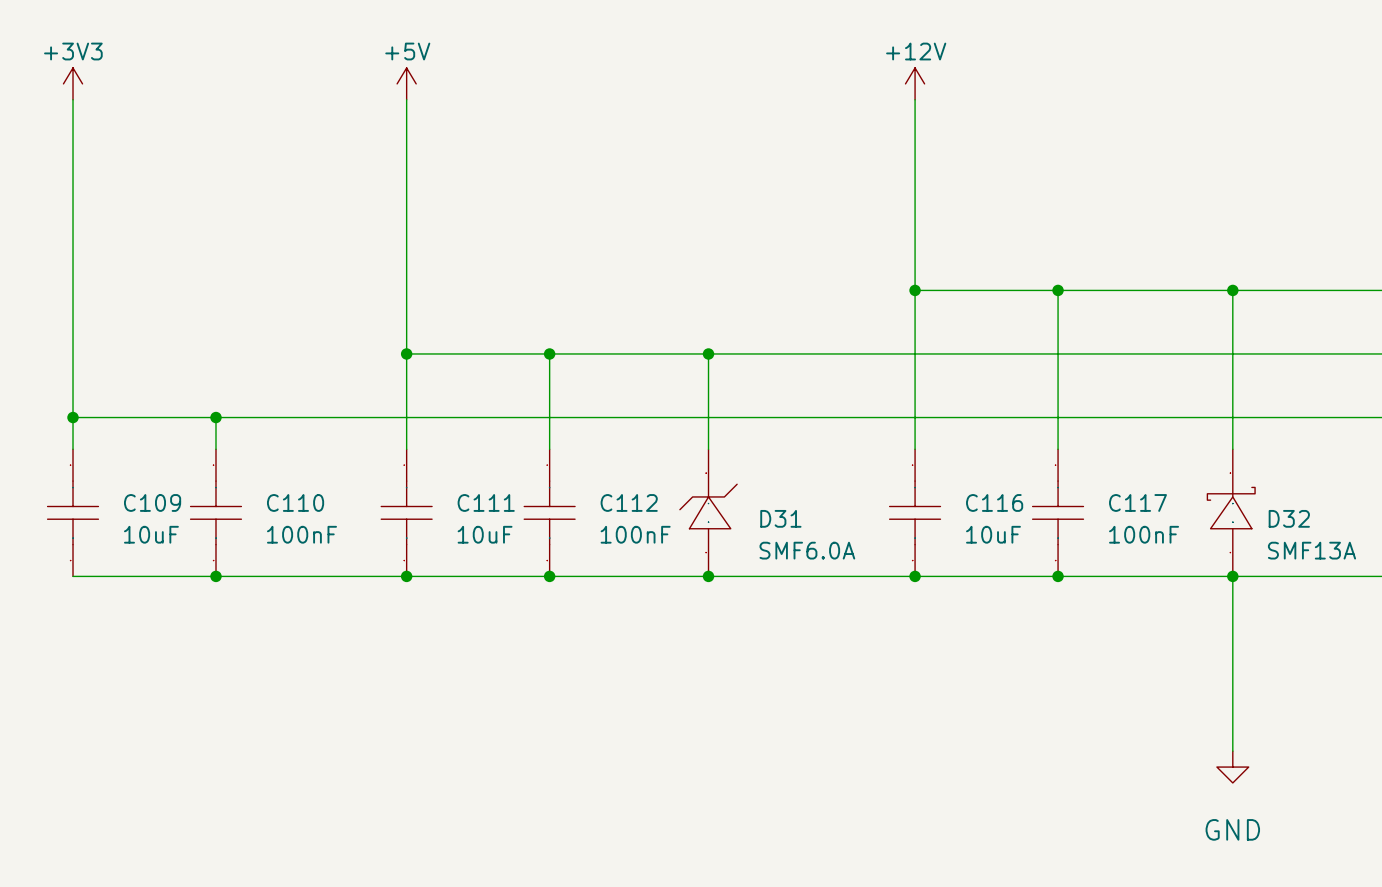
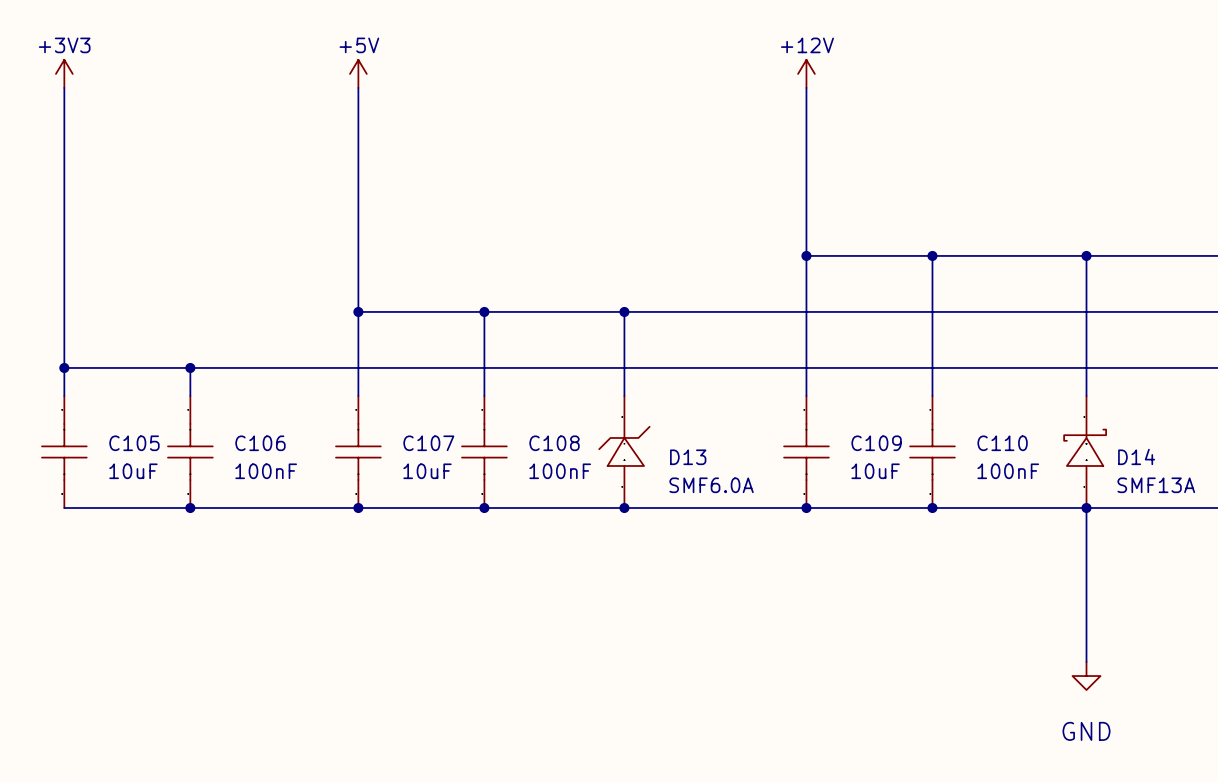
C109 name: C109 (152, 502) -> C105 (134, 443)
C110 name: C110 (295, 502) -> C106 (260, 443)
C111 name: C111 (486, 502) -> C107 (428, 443)
C112 name: C112 (629, 502) -> C108 (554, 443)
C116 name: C116 (994, 502) -> C109 (876, 443)
C117 name: C117 (1137, 502) -> C110 (1002, 443)
D31 name: D31 (780, 518) -> D13 (688, 457)
D32 name: D32 (1289, 518) -> D14 (1136, 456)

